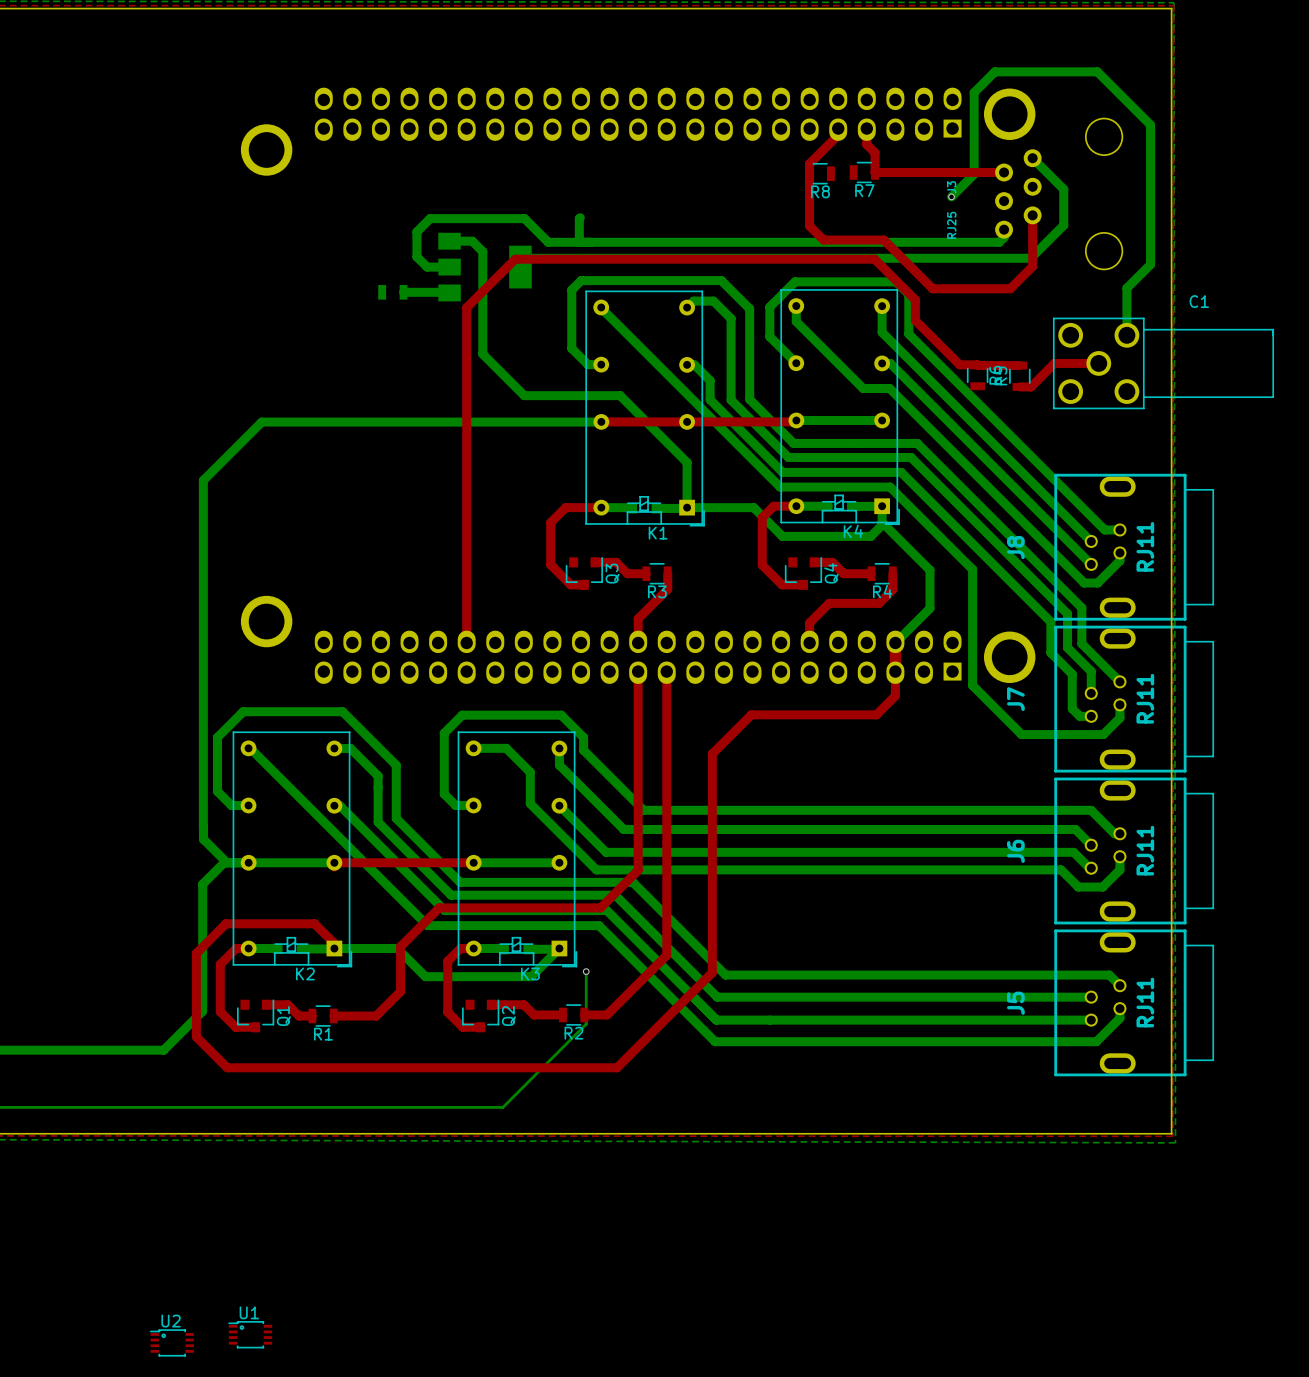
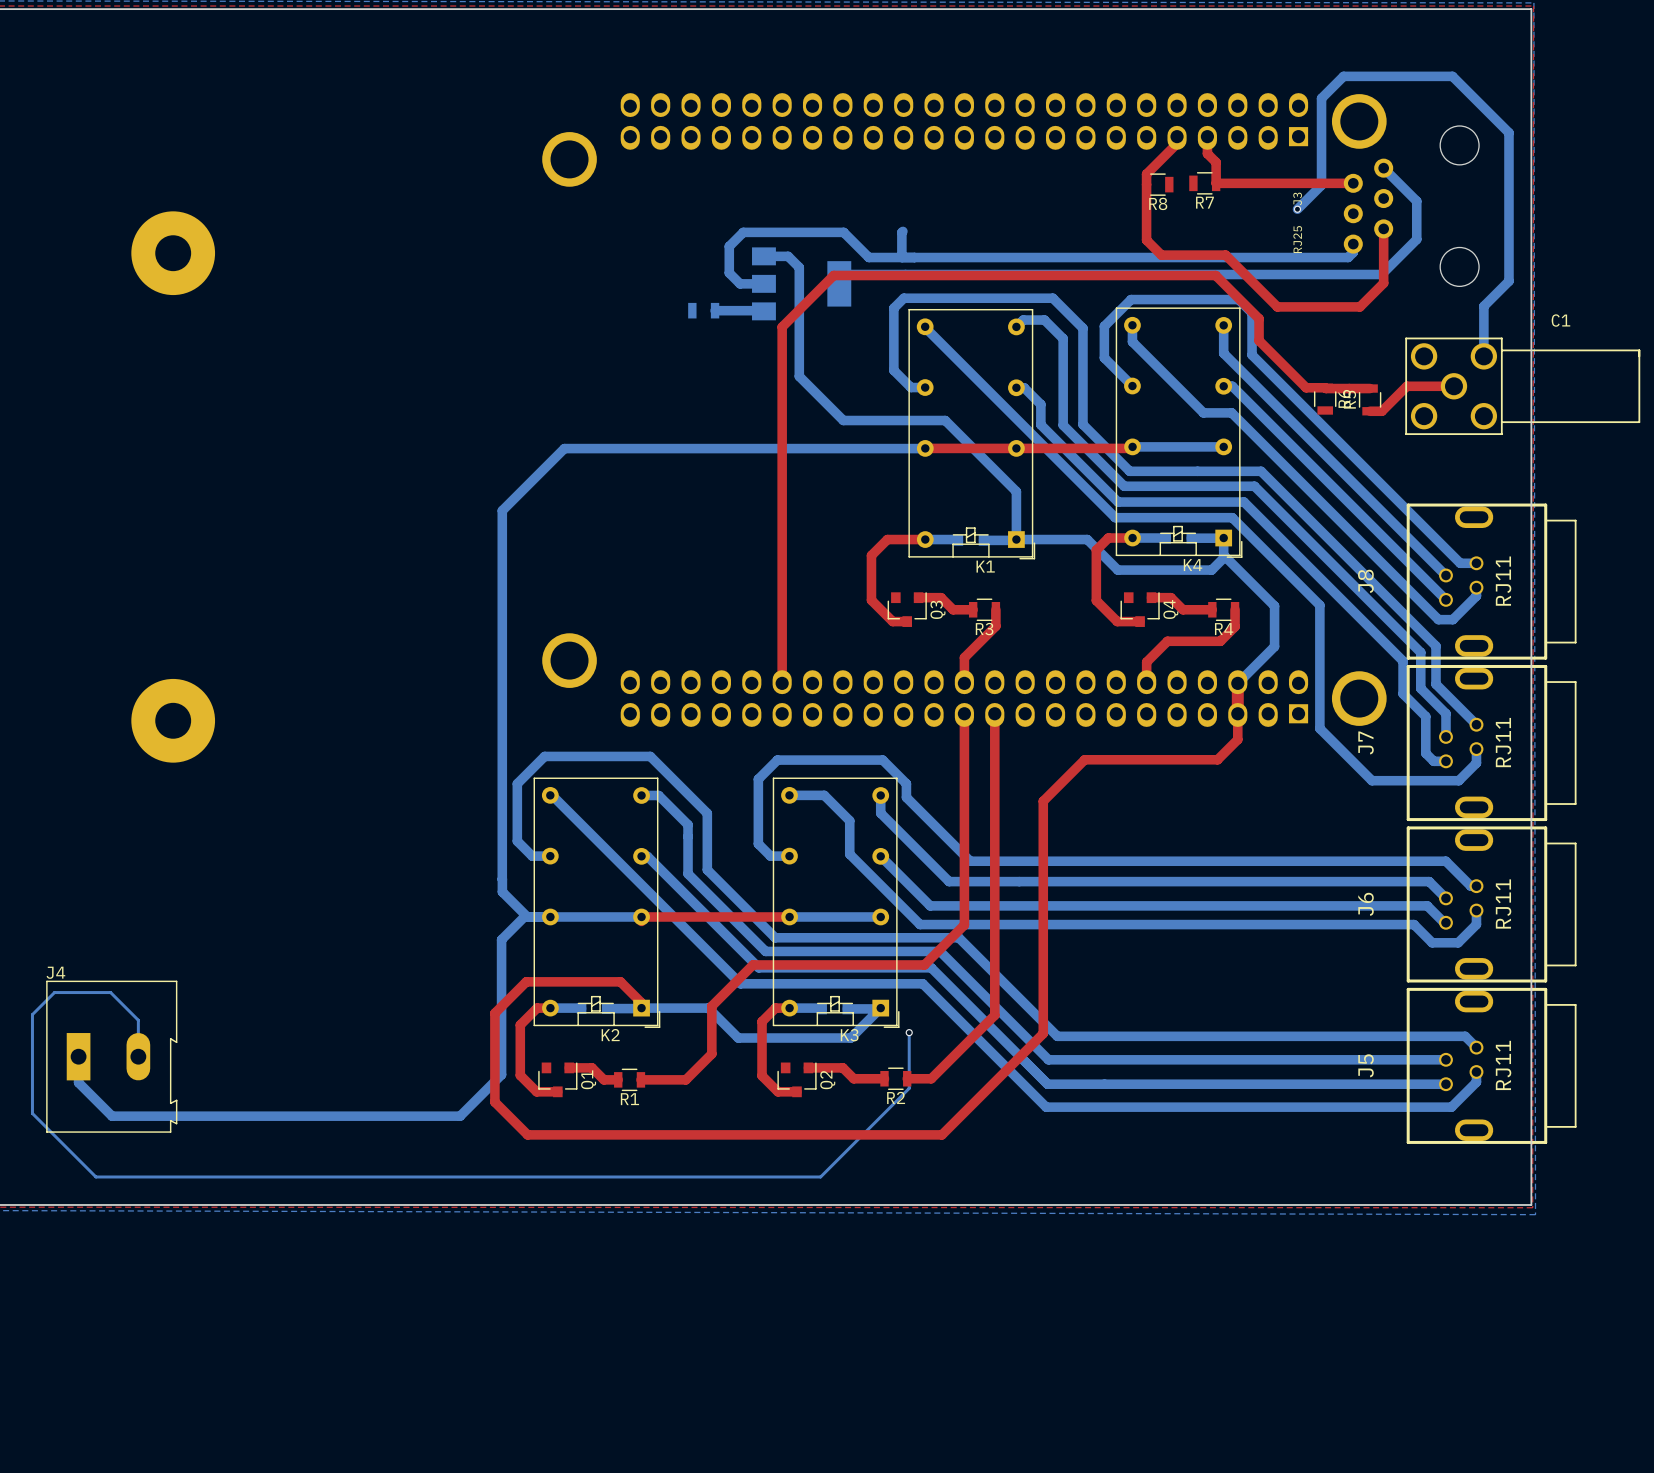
U1: (250, 1334) -> none
U2: (171, 1342) -> none

